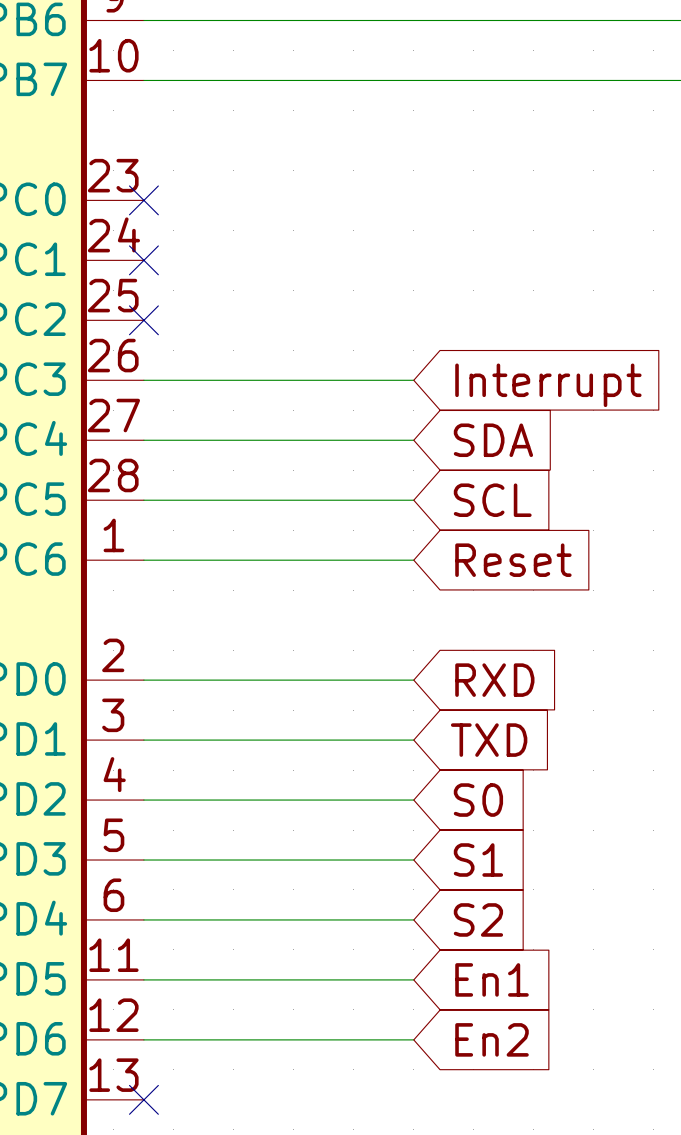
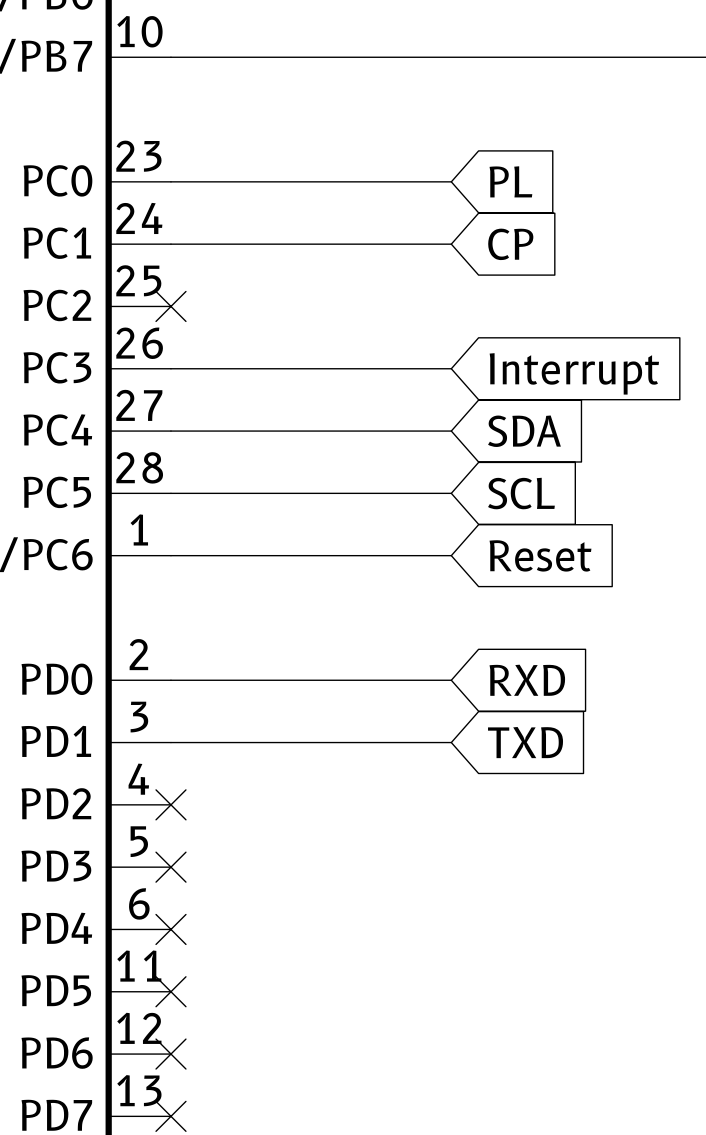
wire: none -> (170, 181) (451, 181)
no-connect mark: (143, 200) -> none
global label: none -> PL (510, 181)
no-connect mark: (143, 260) -> none
global label: none -> CP (510, 244)
wire: (143, 800) (413, 800) -> (170, 244) (451, 244)
no-connect mark: none -> (170, 804)
global label: S0 (478, 800) -> none
wire: (143, 860) (413, 860) -> none
no-connect mark: none -> (170, 867)
global label: S1 (478, 860) -> none
wire: (143, 919) (413, 919) -> none
no-connect mark: none -> (170, 929)
global label: S2 (478, 919) -> none
wire: (143, 979) (413, 979) -> none
no-connect mark: none -> (170, 991)
global label: En1 (491, 979) -> none
wire: (143, 1039) (413, 1039) -> none
no-connect mark: none -> (170, 1054)
global label: En2 (491, 1039) -> none

